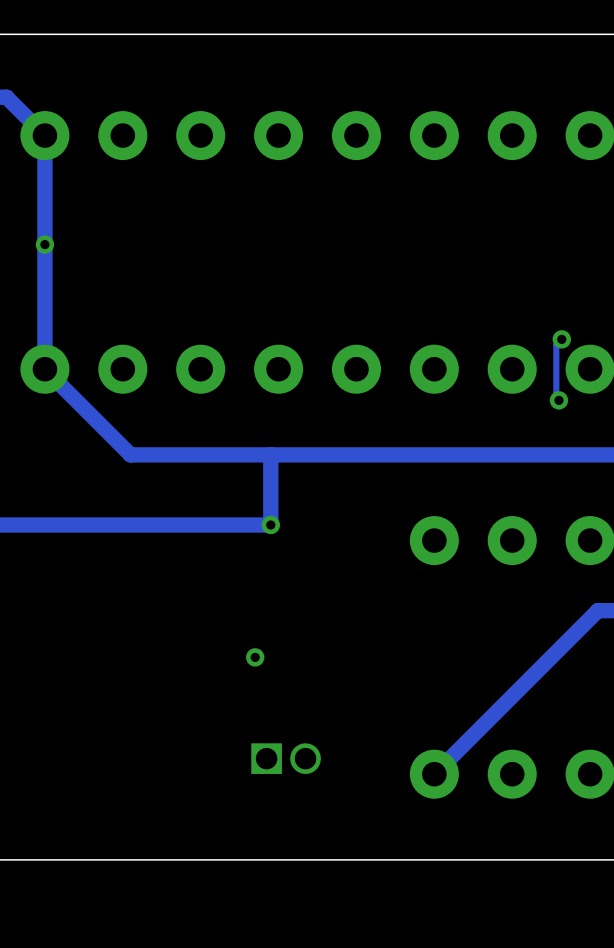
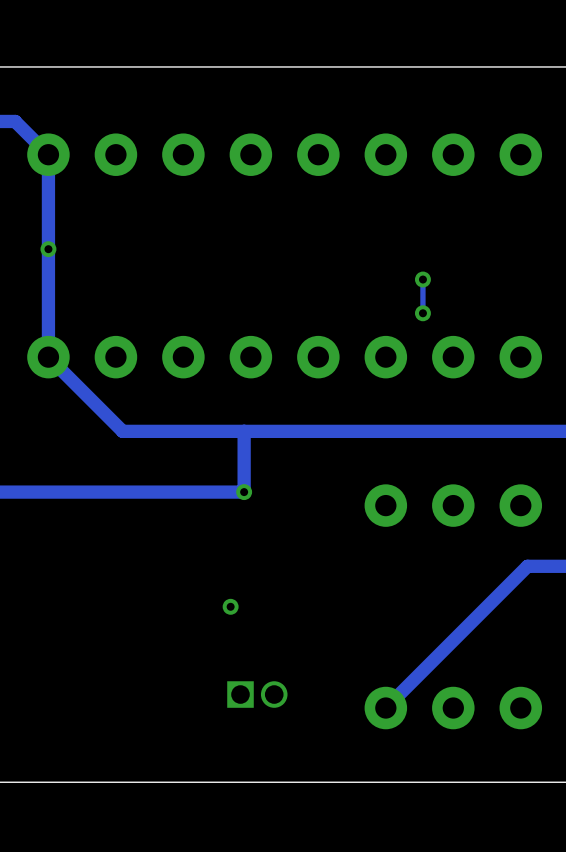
track: none -> (422, 279) (422, 313)
via: none -> (422, 279)
via: none -> (422, 313)
track: (561, 339) (556, 344) (556, 397) (558, 400) -> none
via: (561, 339) -> none
via: (558, 400) -> none

